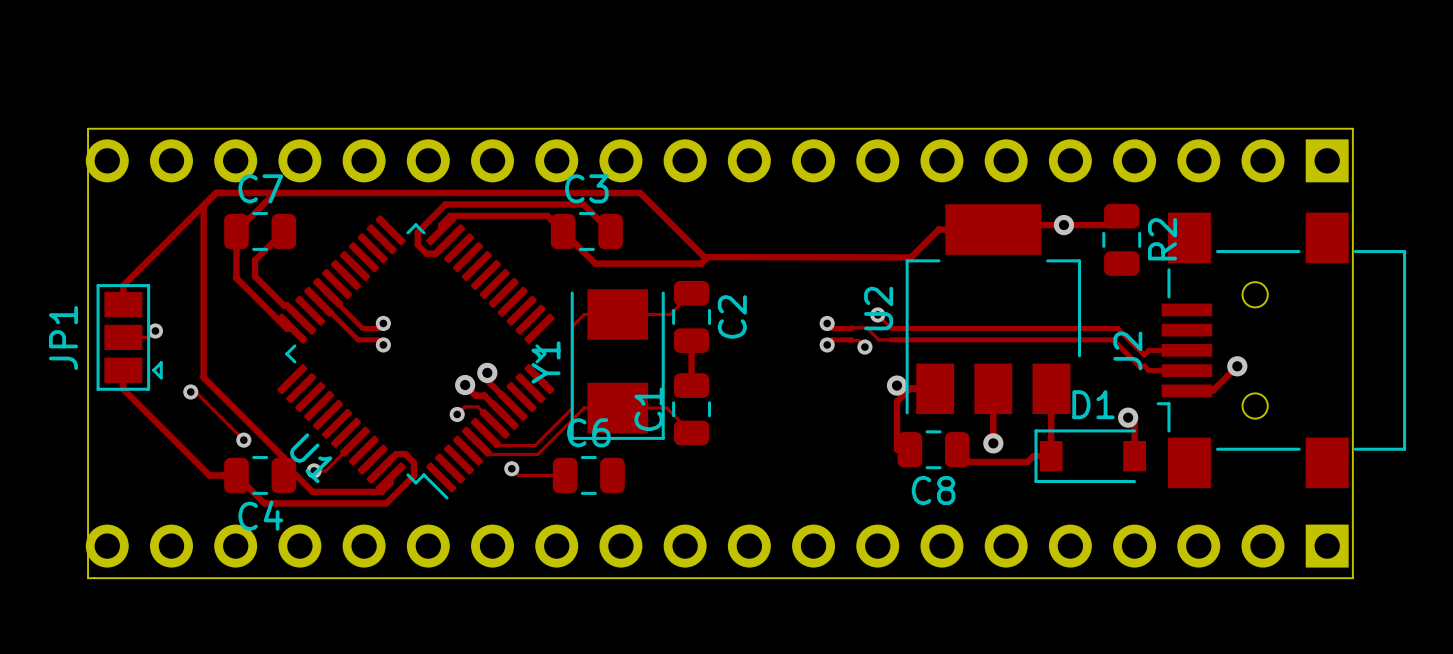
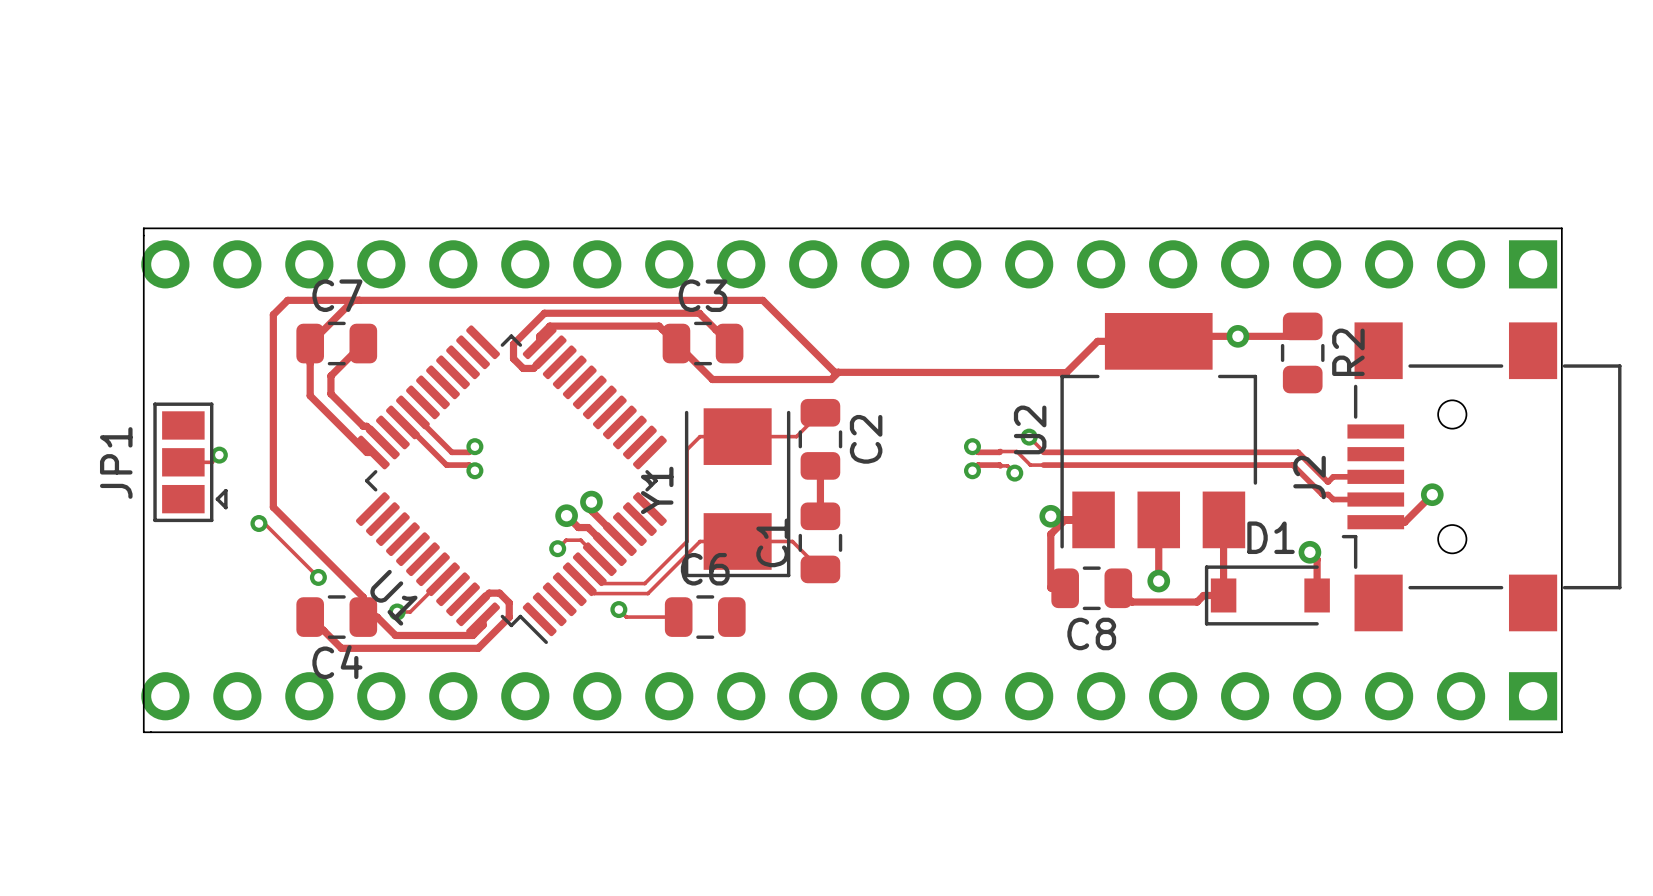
track: (216, 192) (123, 285) (123, 304) -> none
track: (123, 370) (123, 389) (209, 475) (236, 475) -> none

